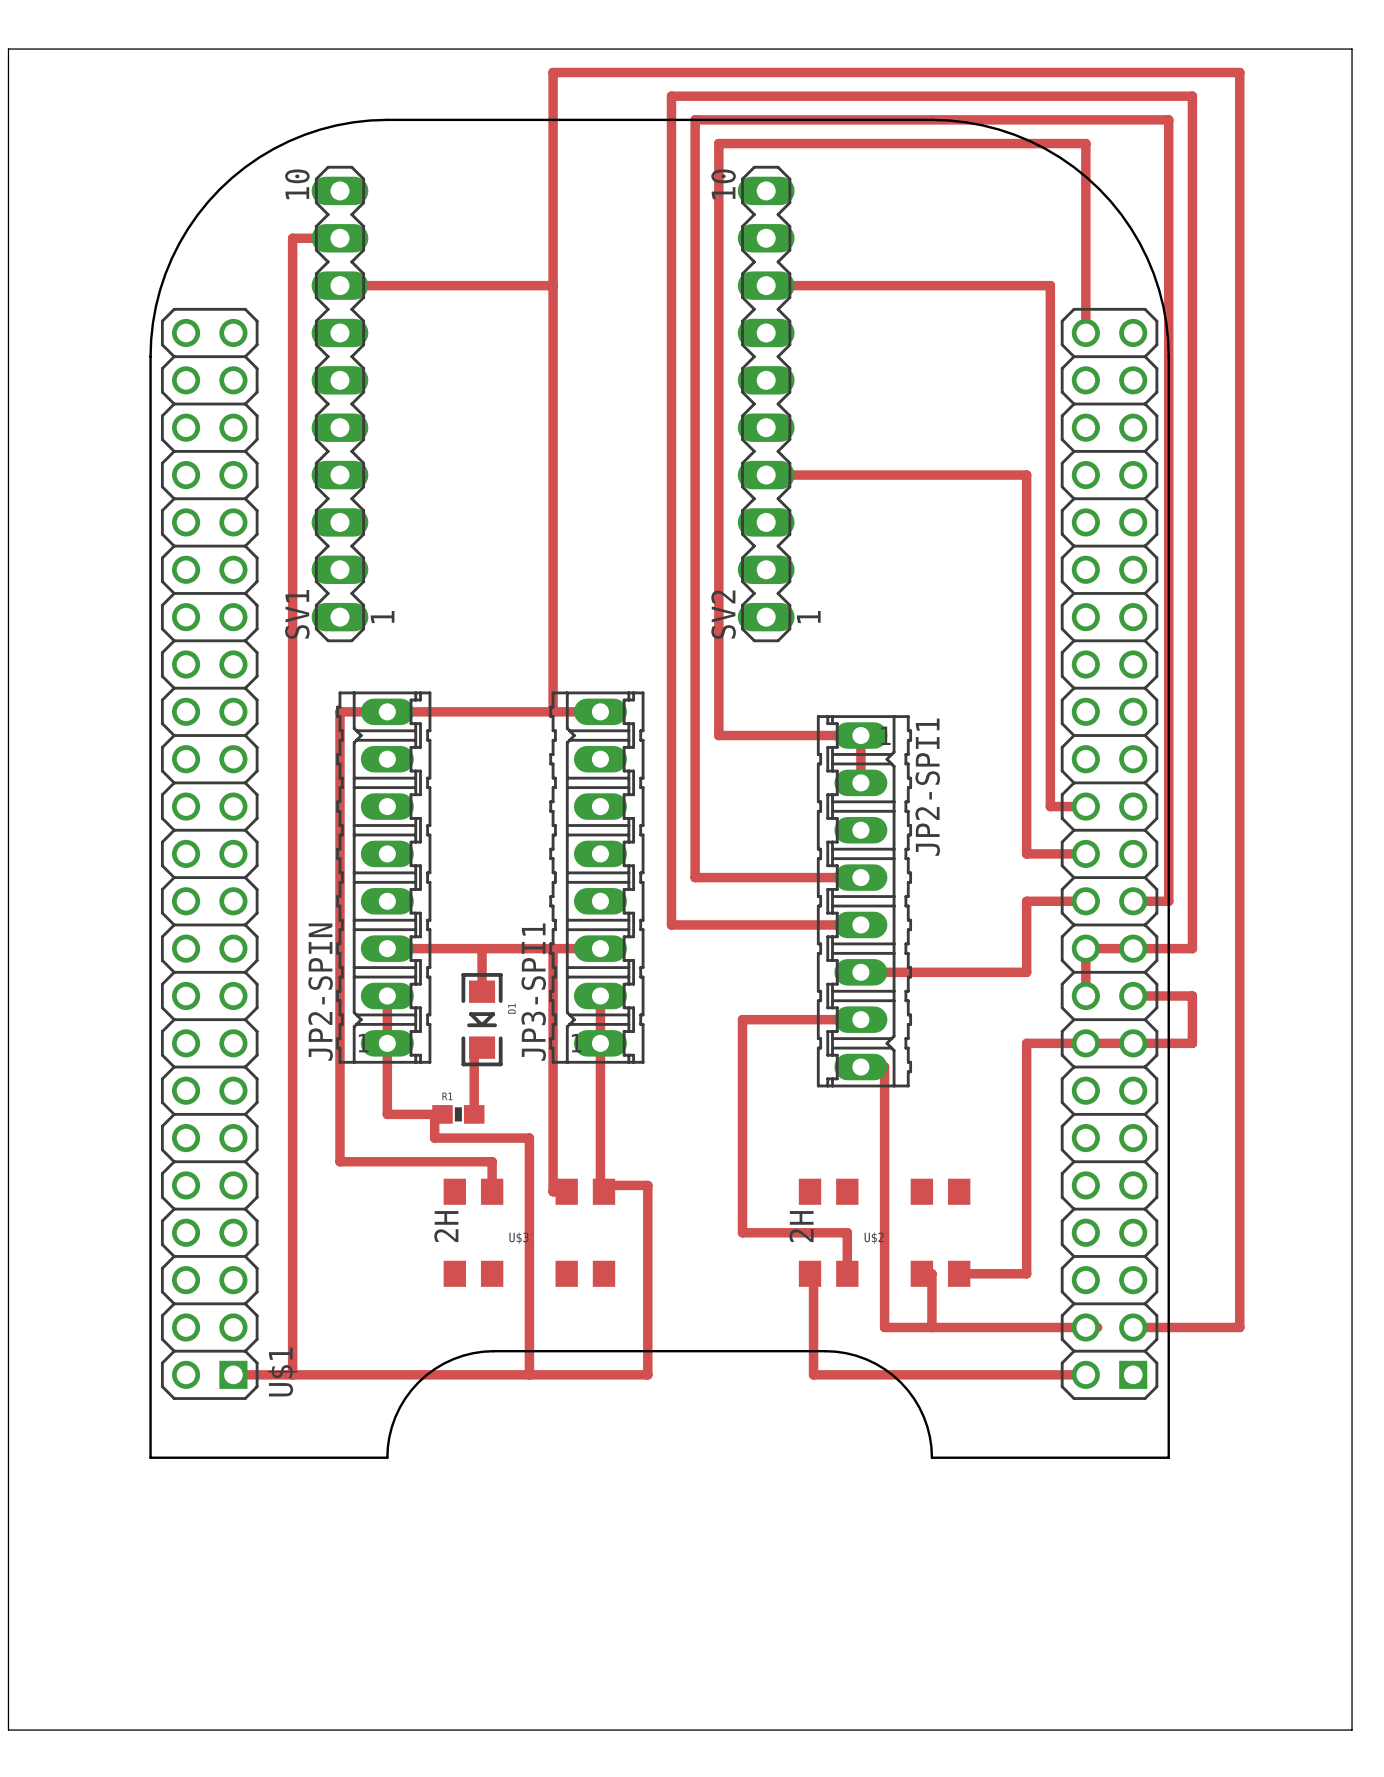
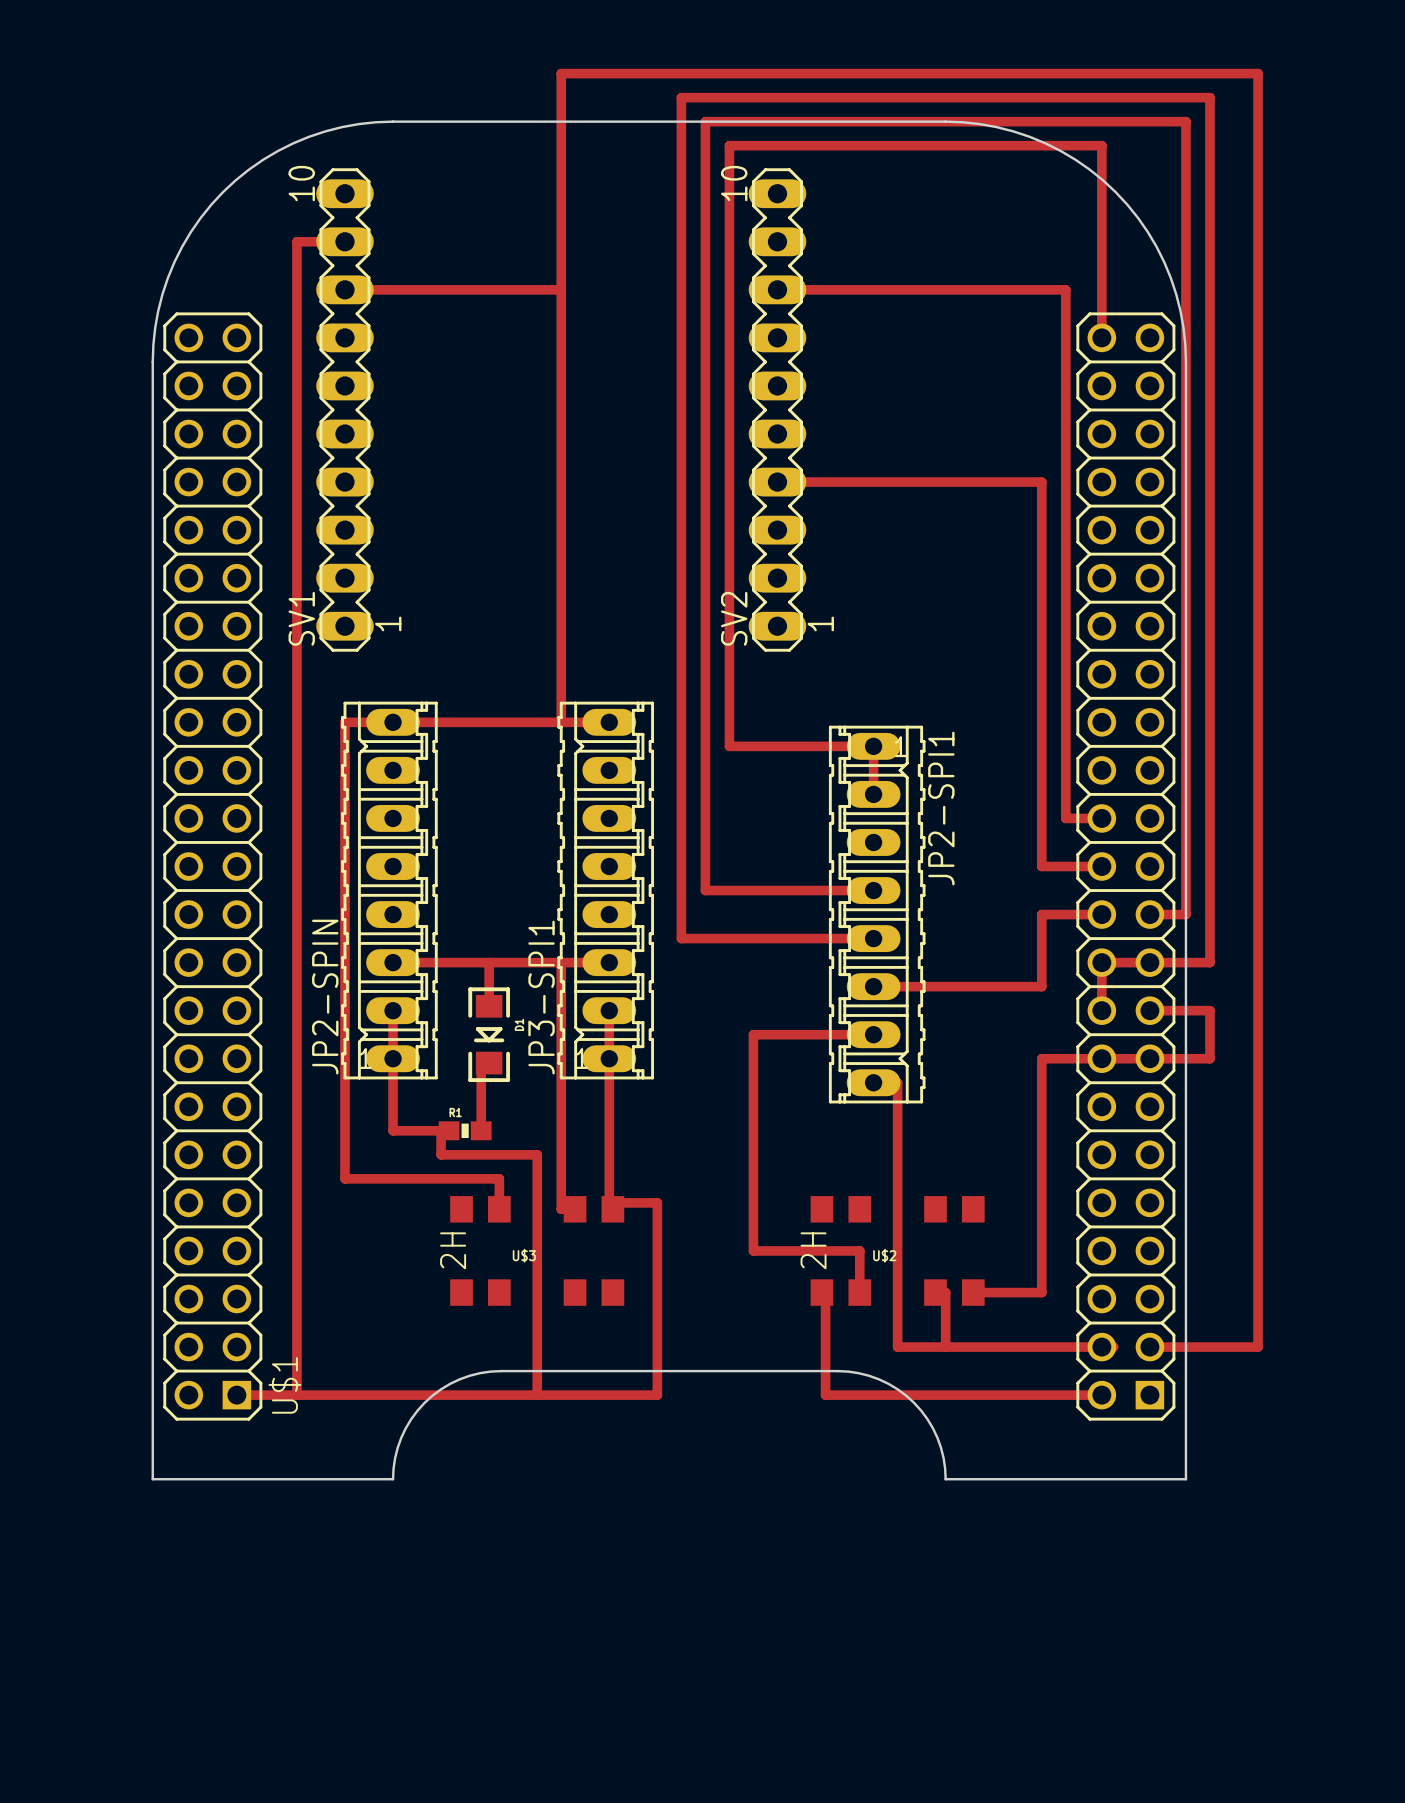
board edge: (8, 49) (1352, 49) (1352, 1730) (8, 1730) (8, 49) -> none

